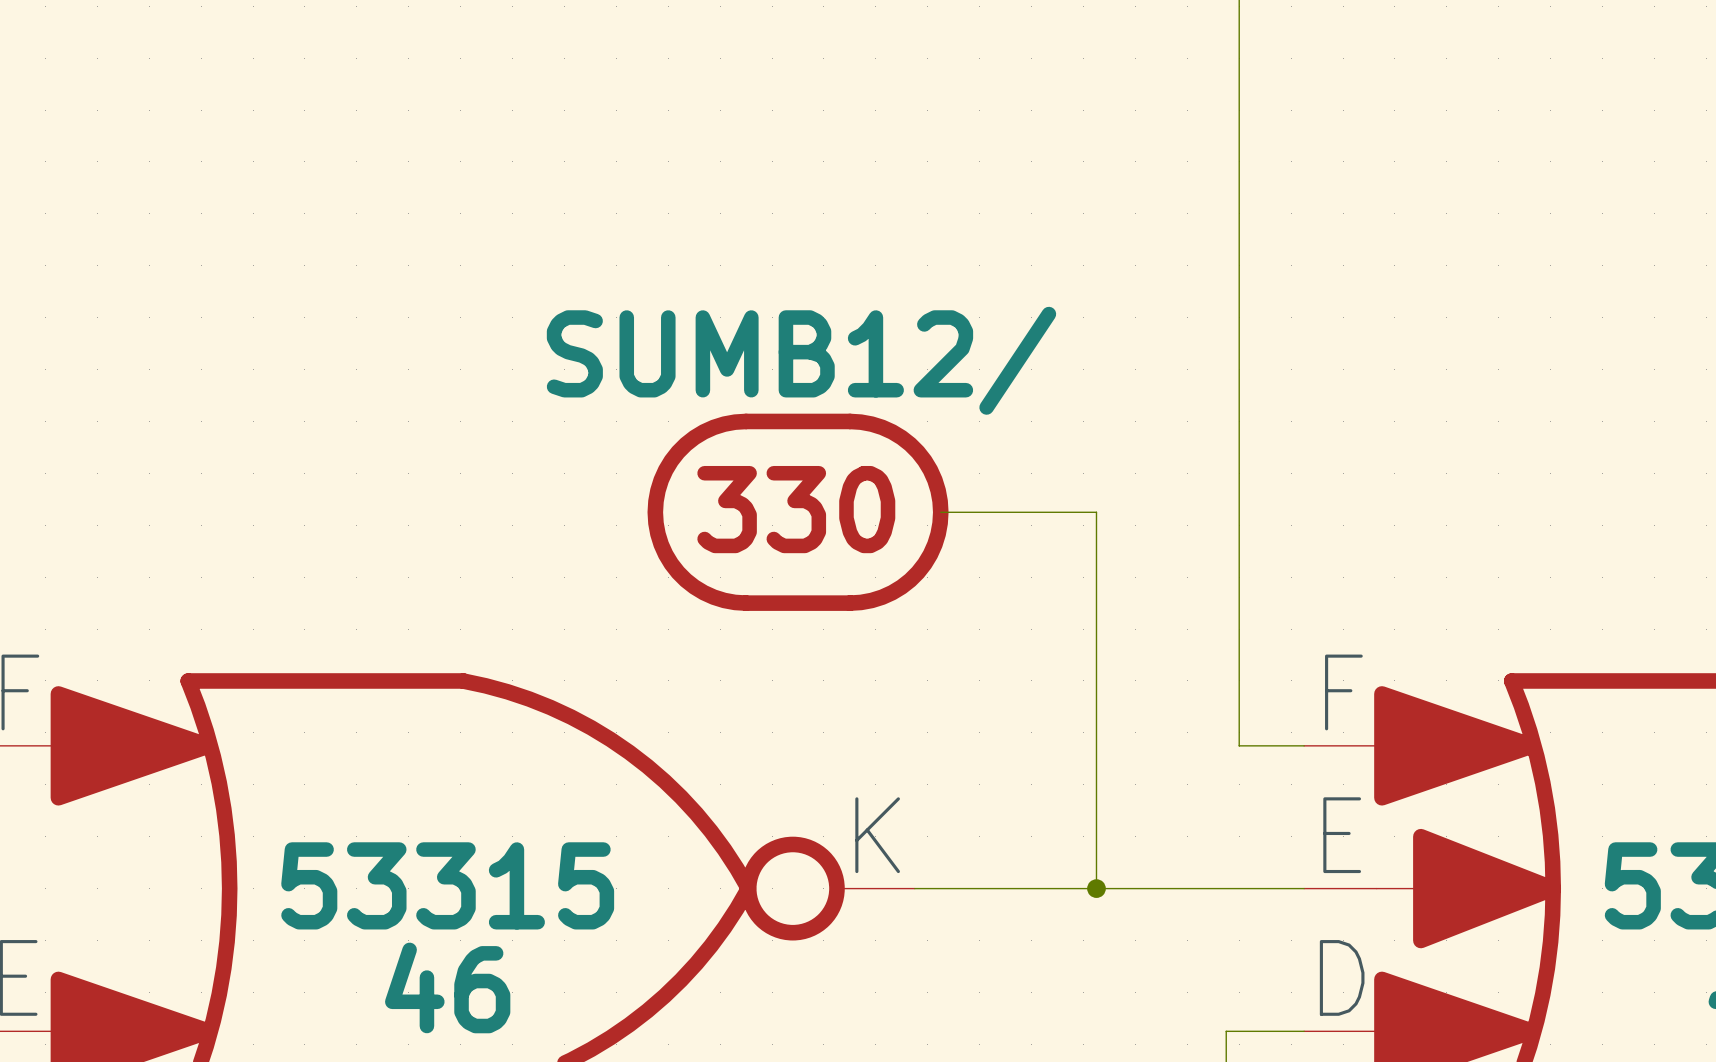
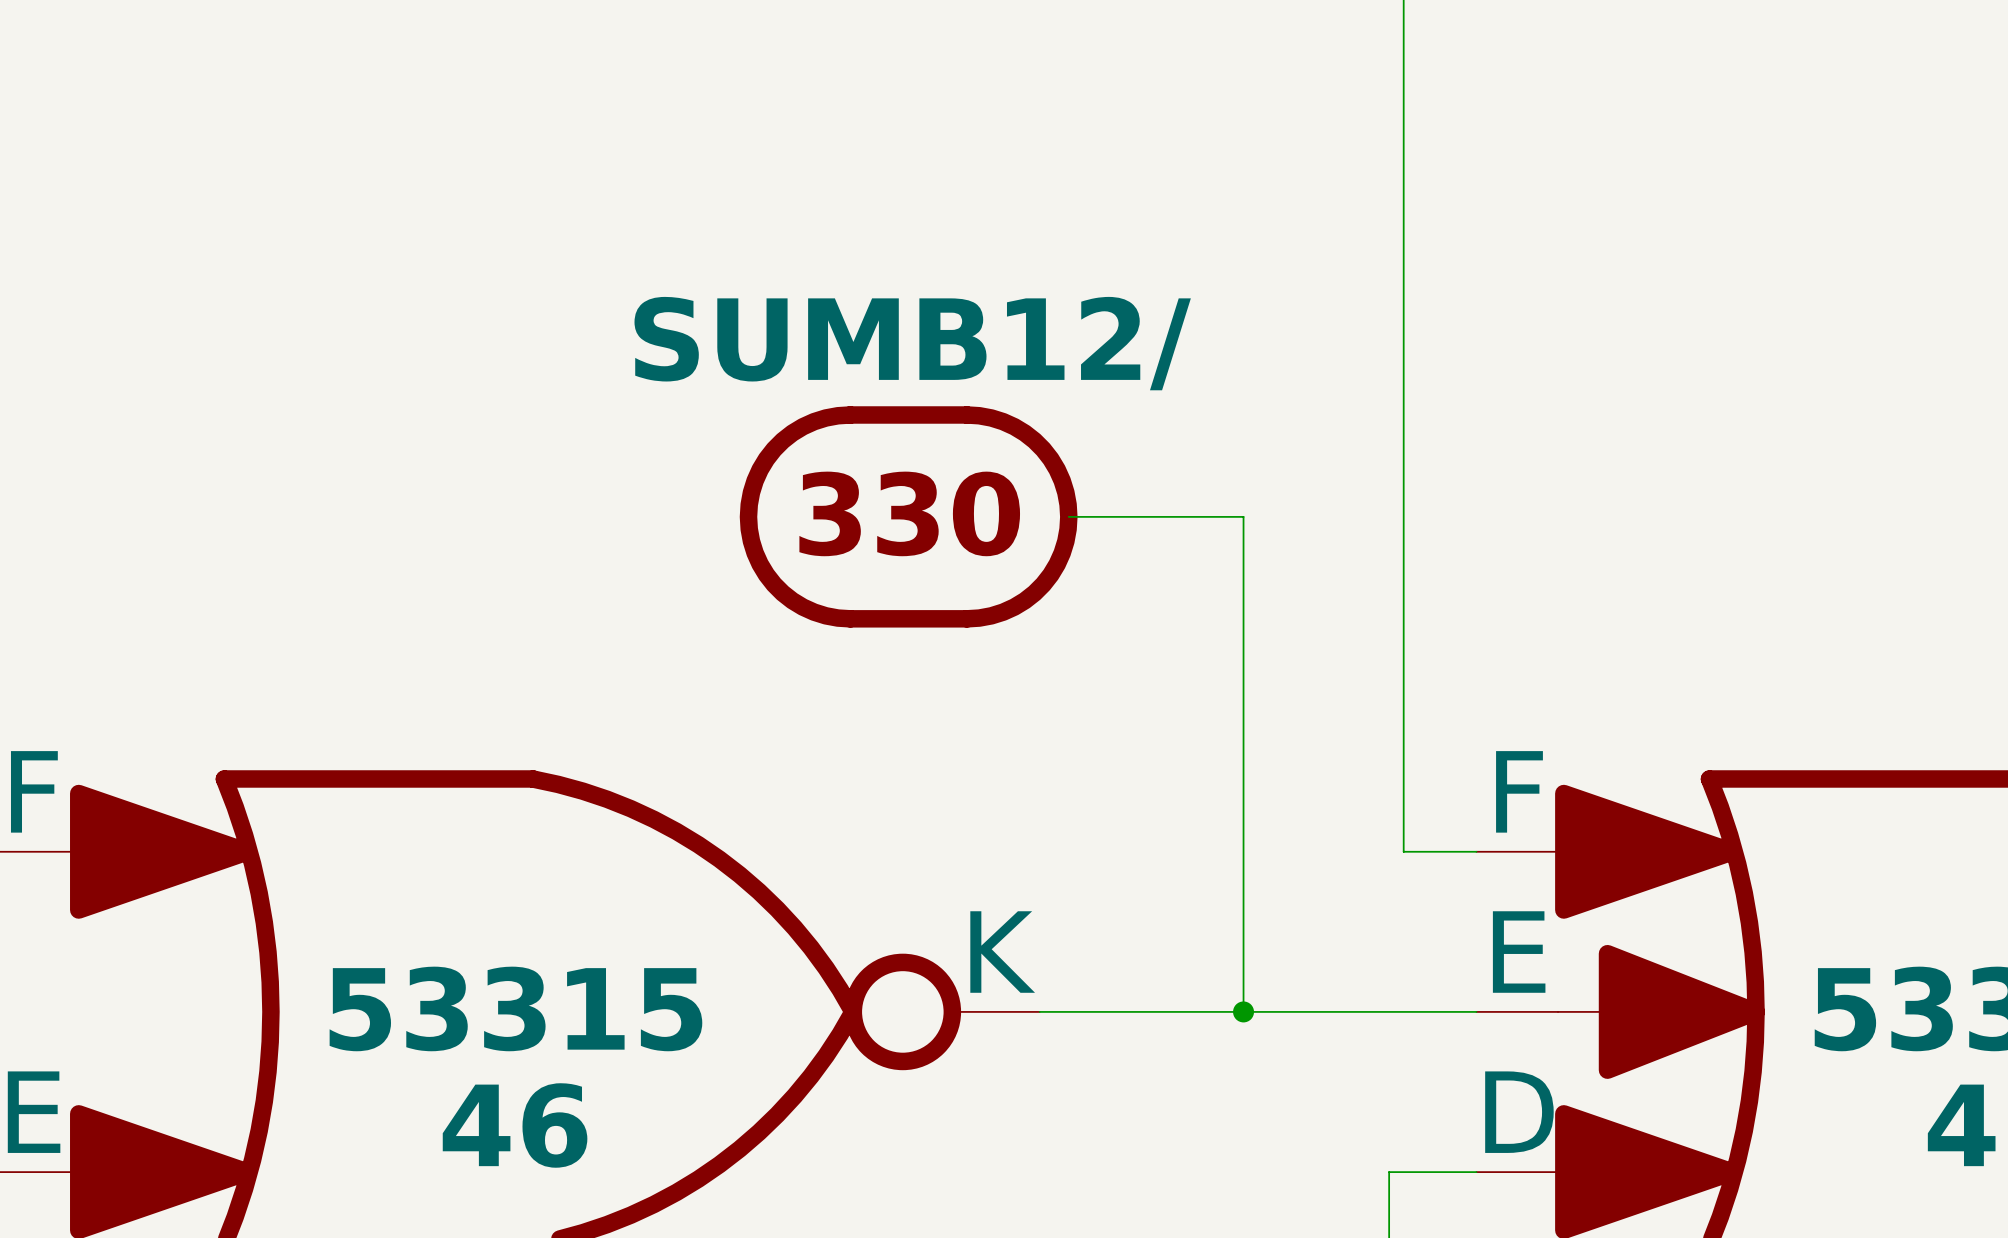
part position: (798, 512) -> (908, 516)
wire: (940, 512) (1096, 512) -> (1068, 516) (1243, 516) (1243, 589)

